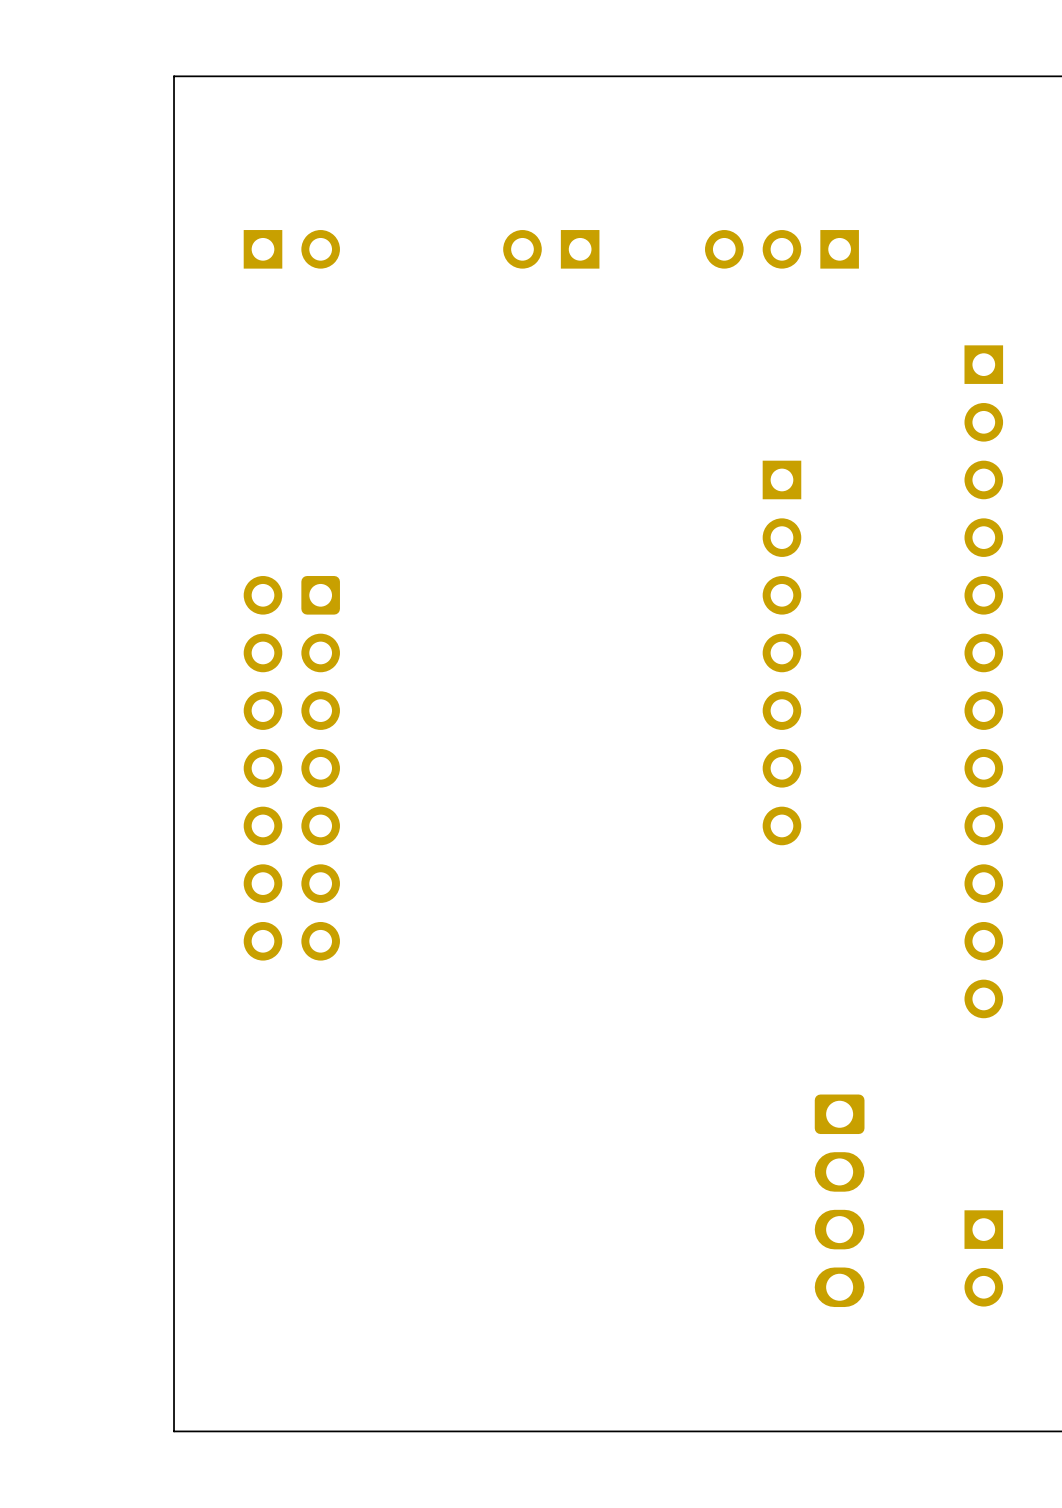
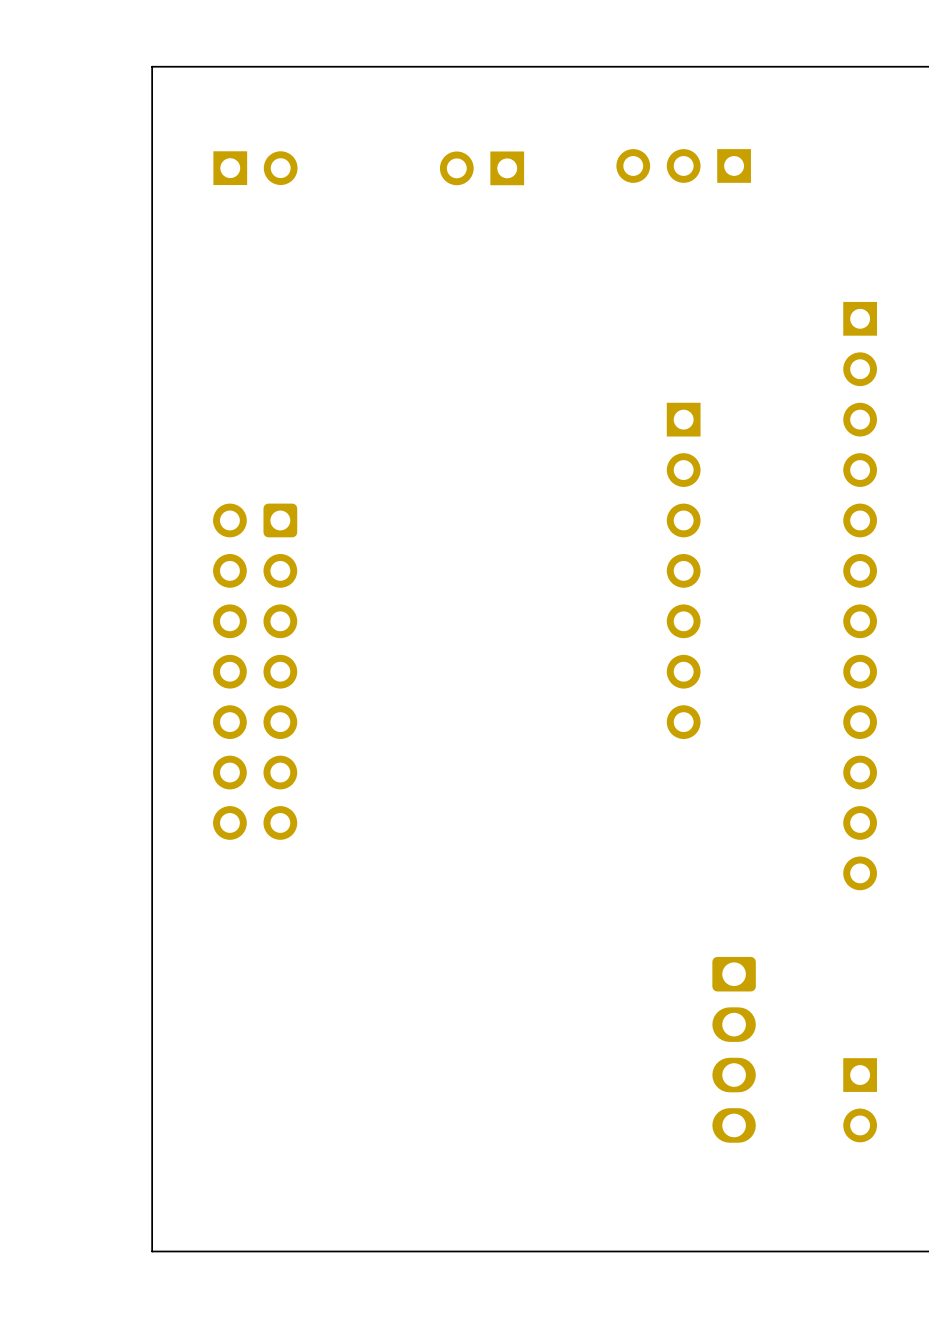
part position: (291, 249) -> (255, 168)
part position: (551, 249) -> (482, 168)
part position: (781, 249) -> (683, 165)

